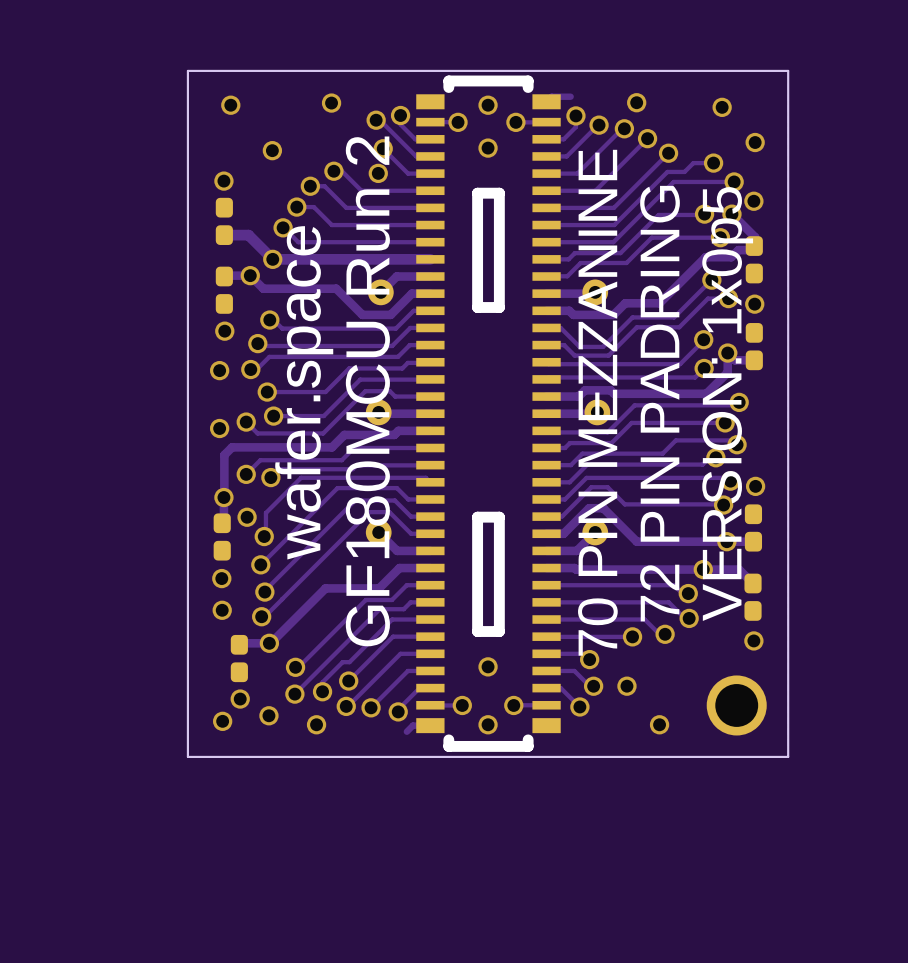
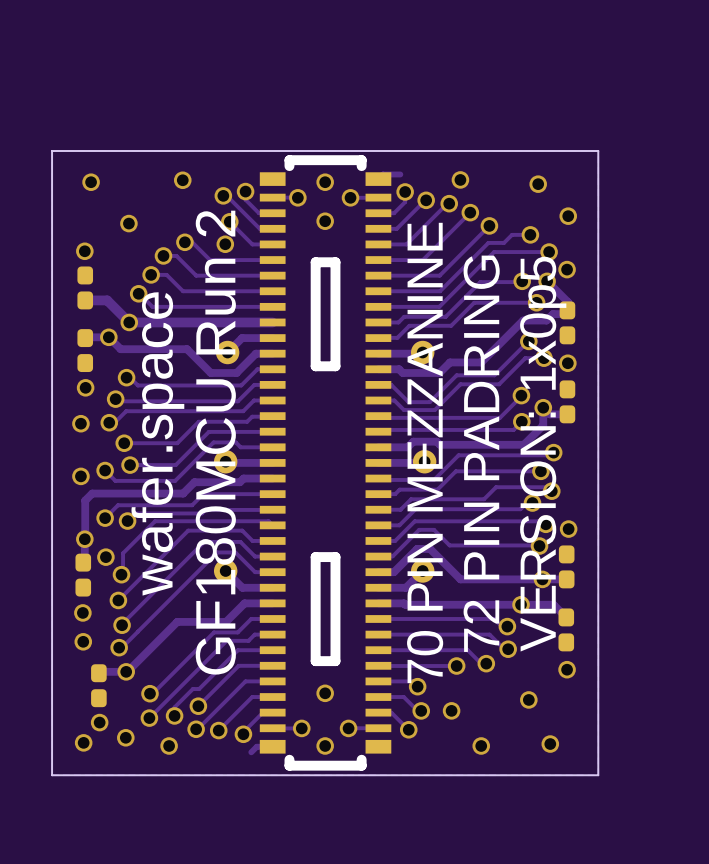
via: none -> (528, 699)
part: (736, 705) -> none
via: none -> (550, 744)

